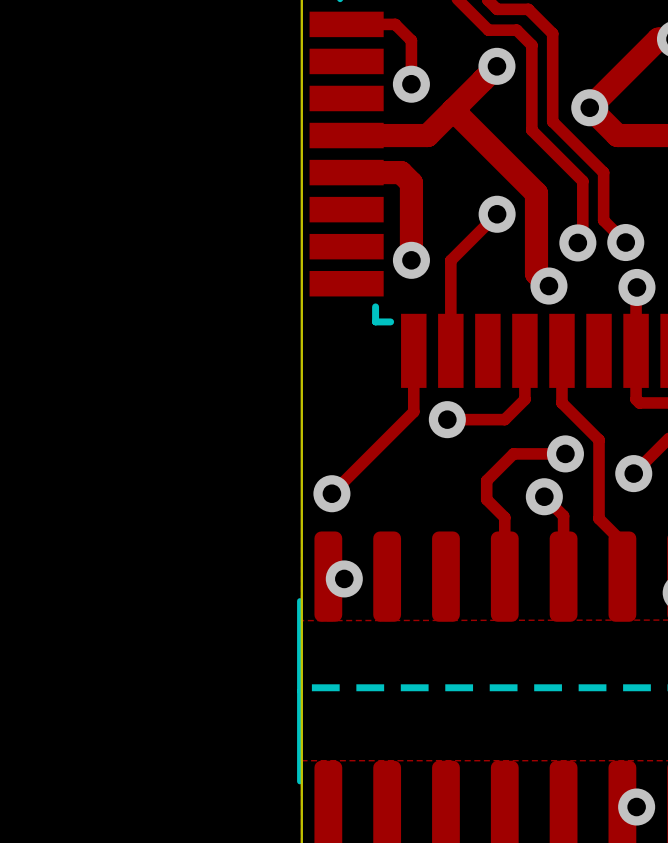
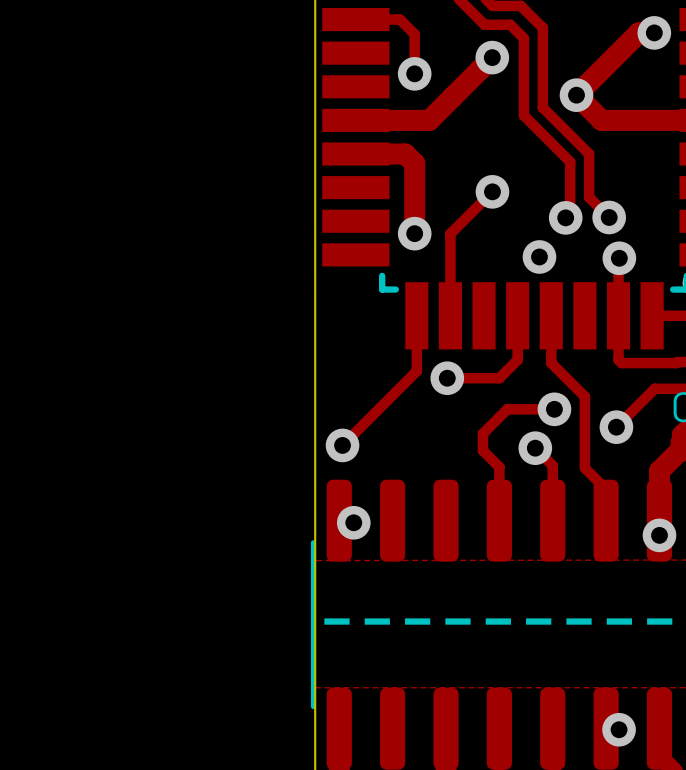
track: (453, 110) (536, 193) (536, 273) (548, 286) -> none

